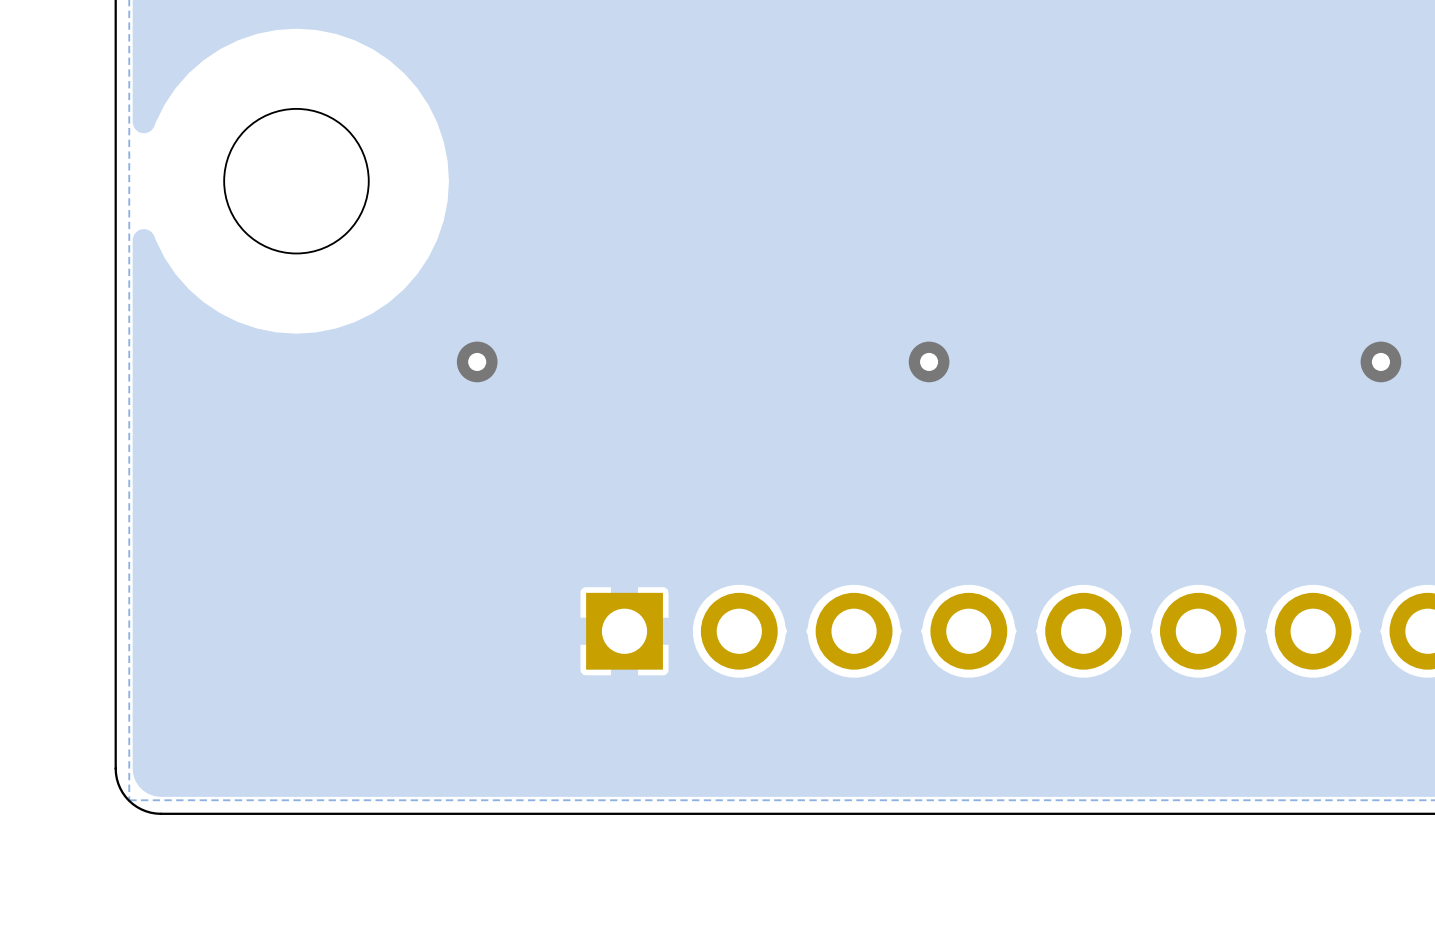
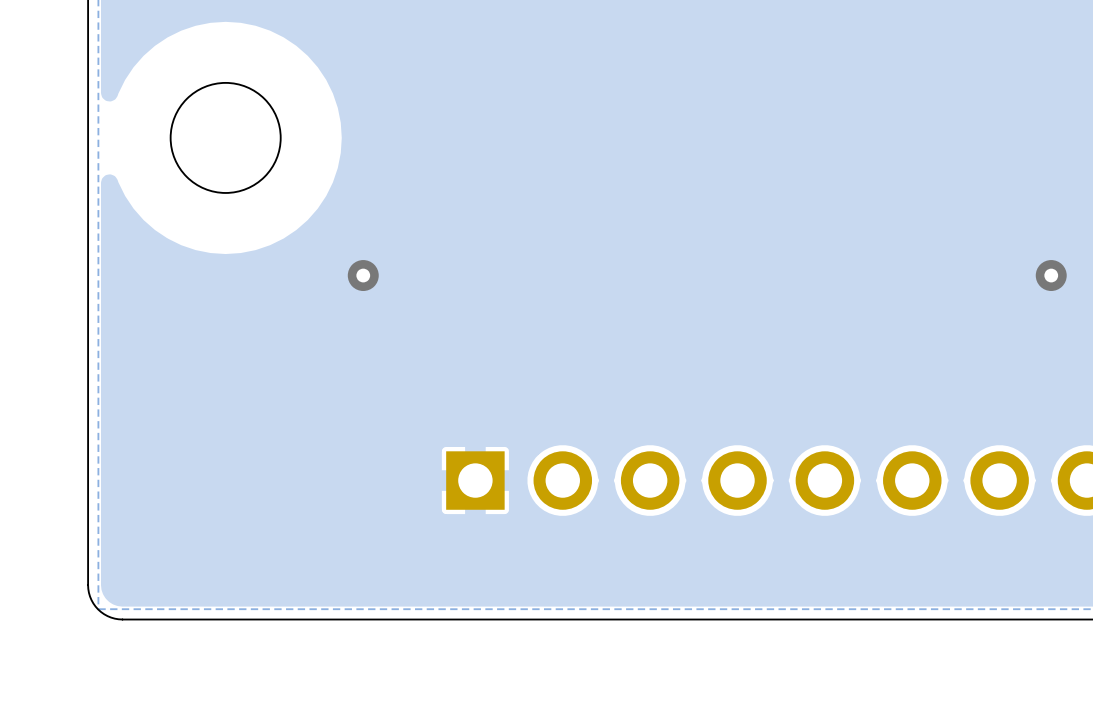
via: (929, 361) -> none

